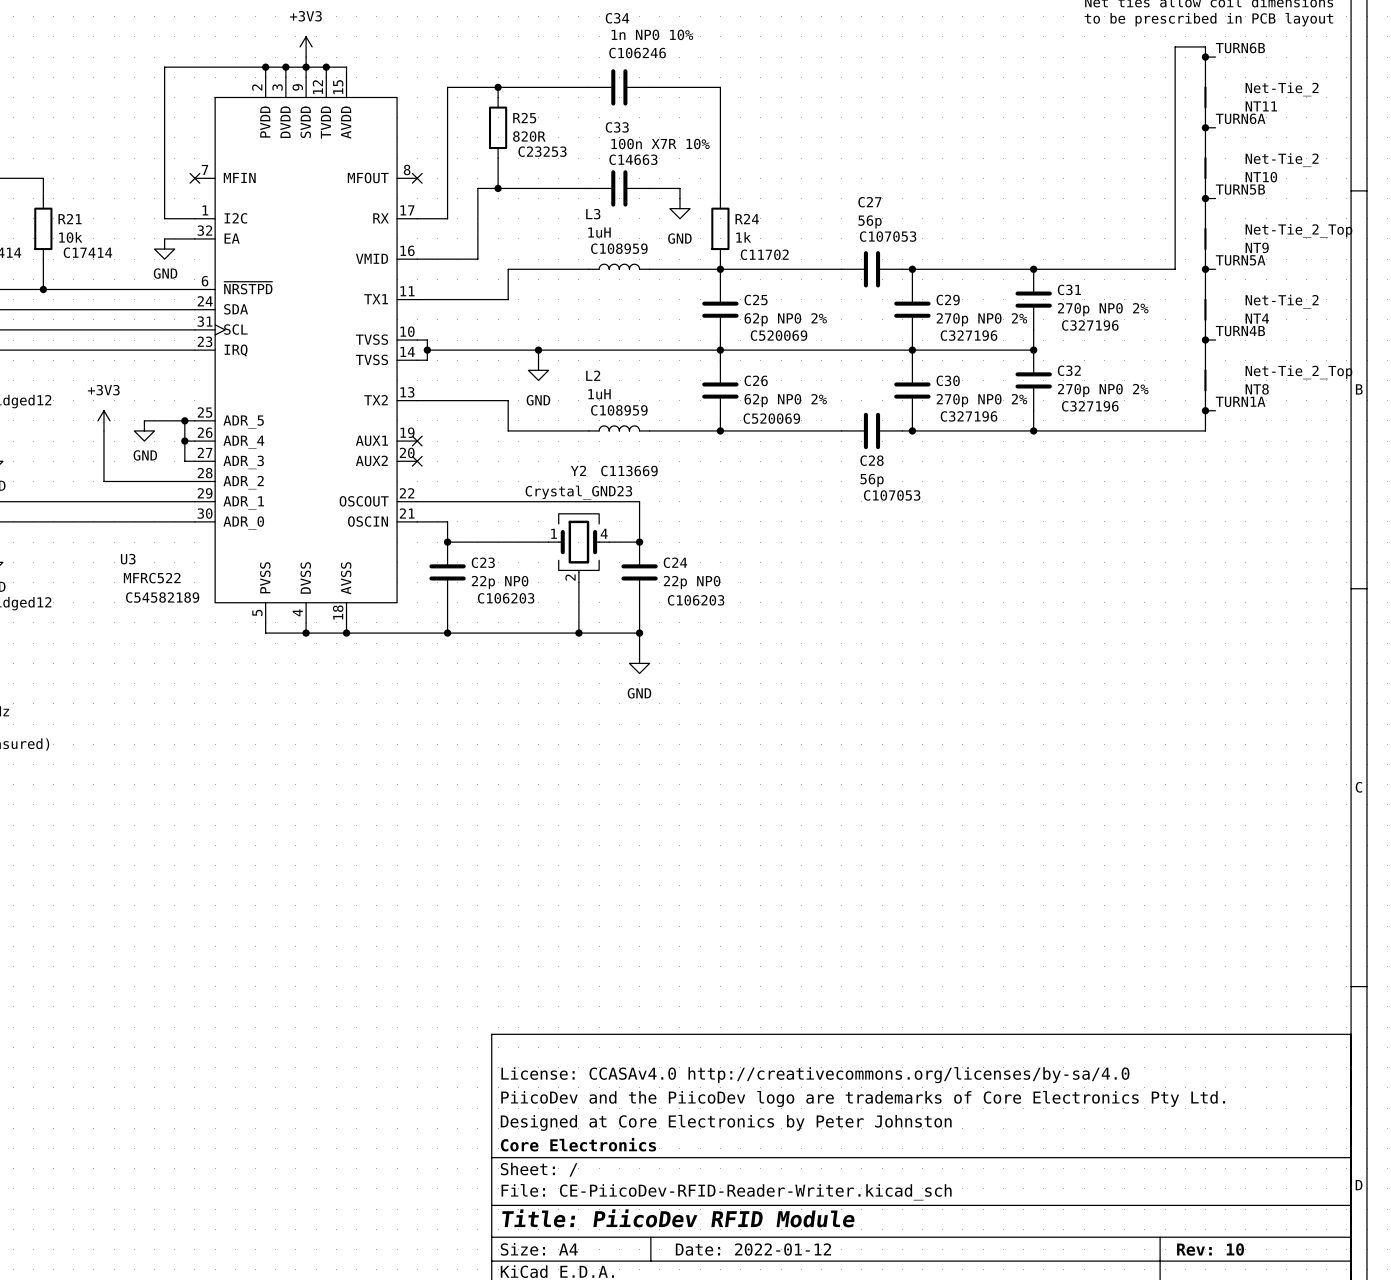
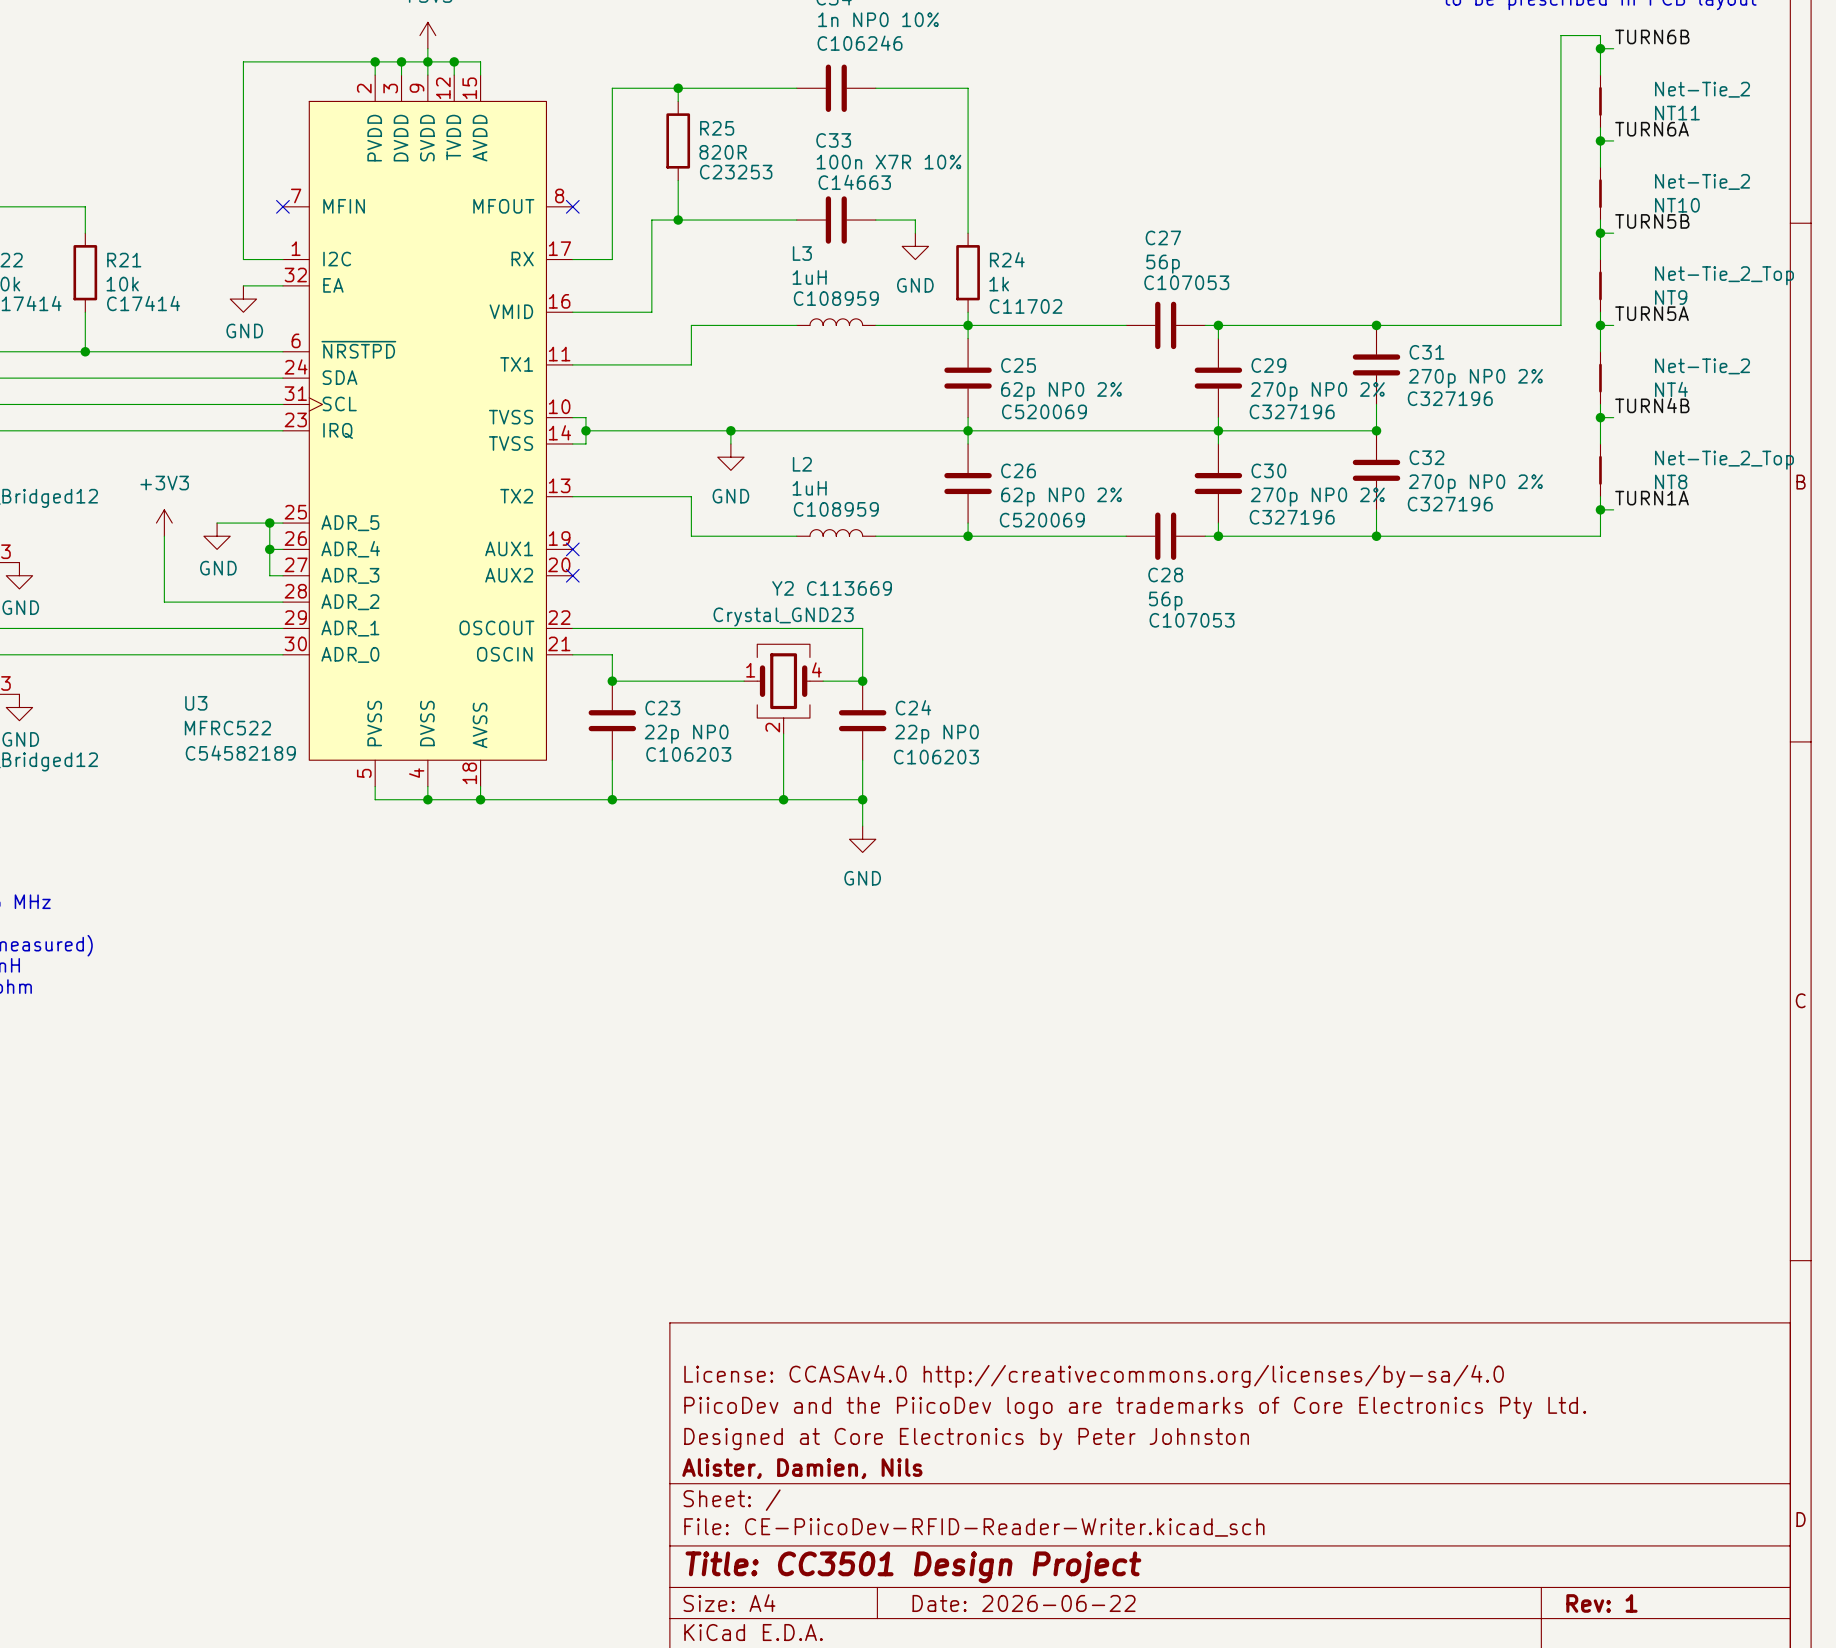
title block: Core Electronics (578, 1144) -> Alister, Damien, Nils (802, 1468)
title block: Title: PiicoDev RFID Module (678, 1218) -> Title: CC3501 Design Project (913, 1567)
title block: Date: 2022-01-12 (753, 1249) -> Date: 2026-06-22 (1024, 1603)
title block: Rev: 10 (1210, 1249) -> Rev: 1 (1601, 1603)

